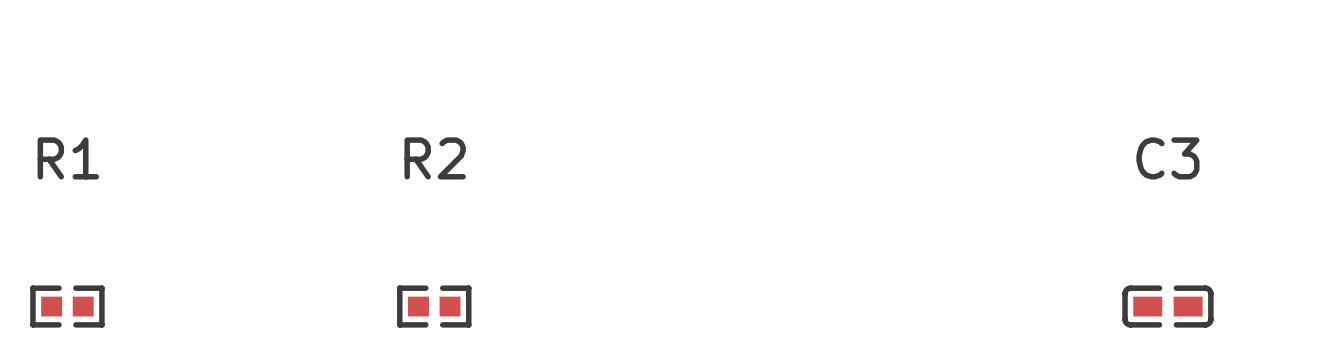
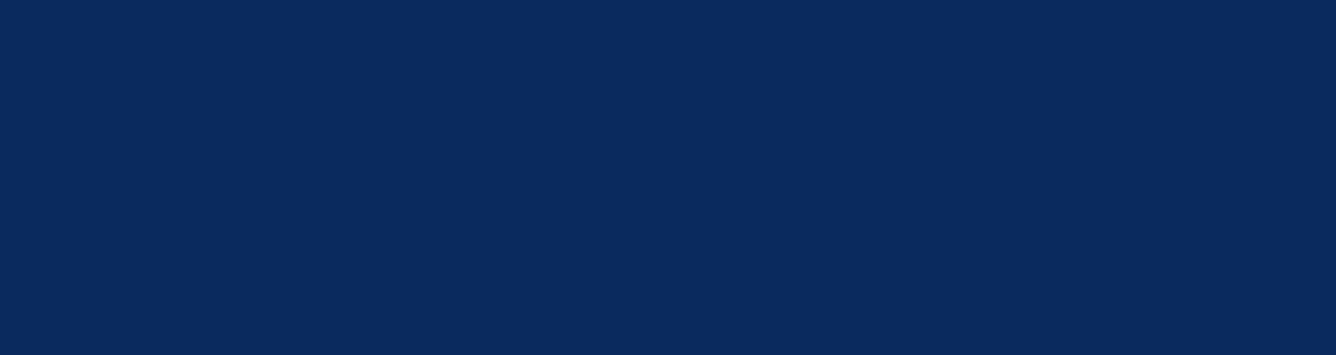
R1: (67, 306) -> none
R2: (434, 306) -> none
C3: (1167, 306) -> none

